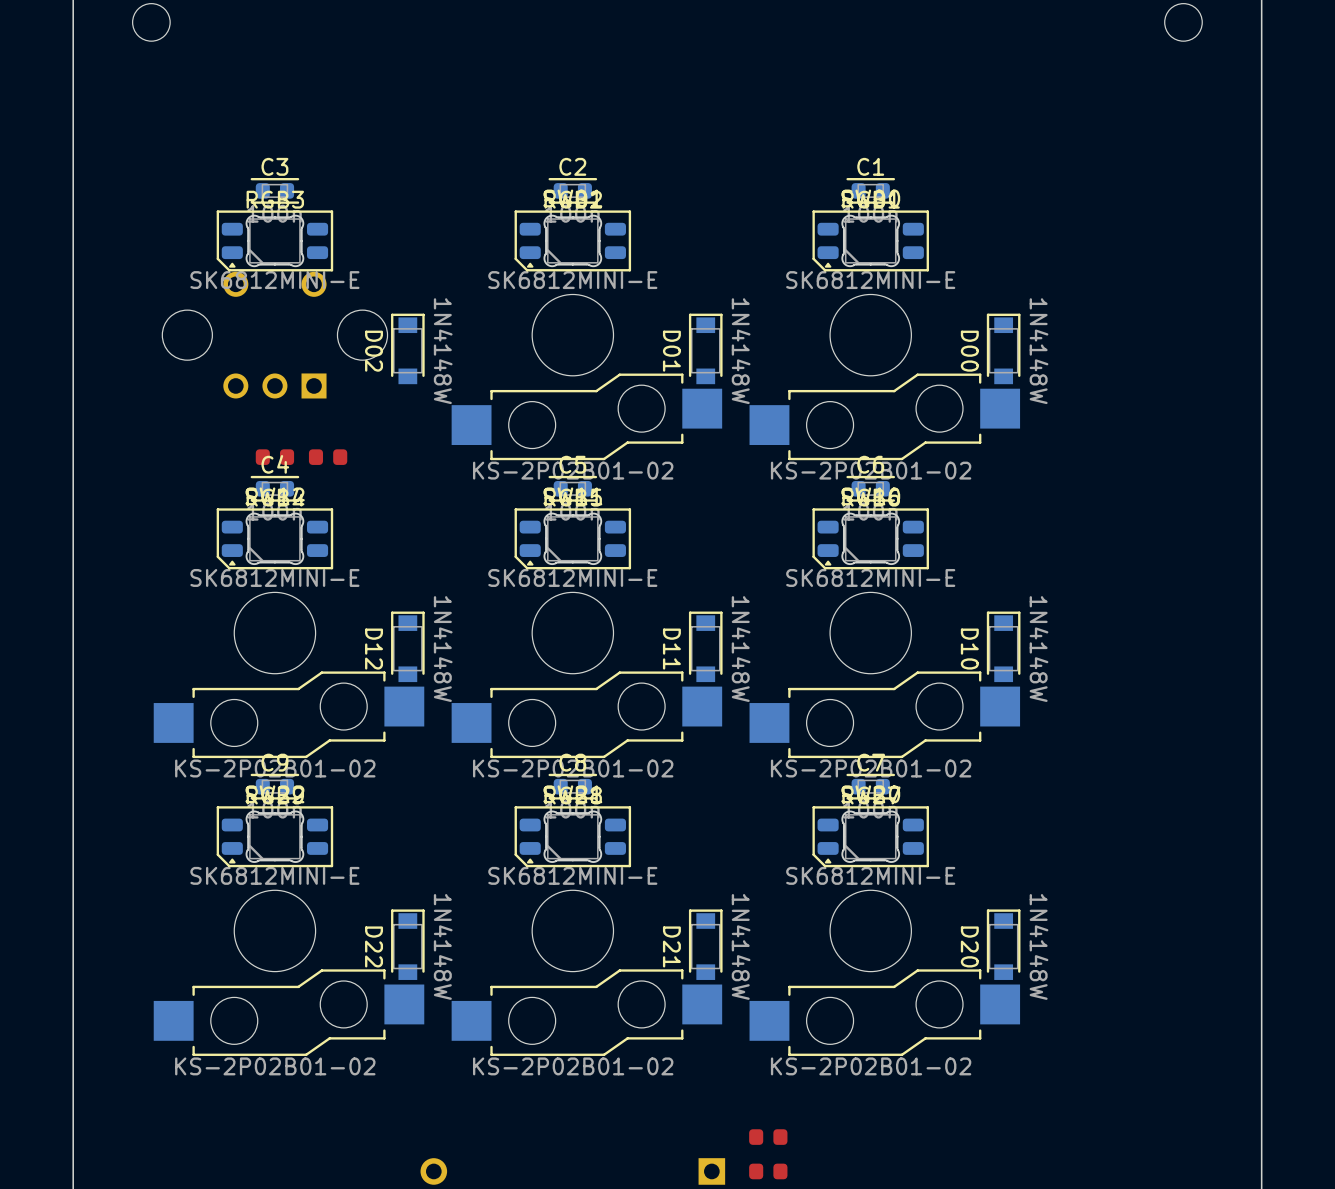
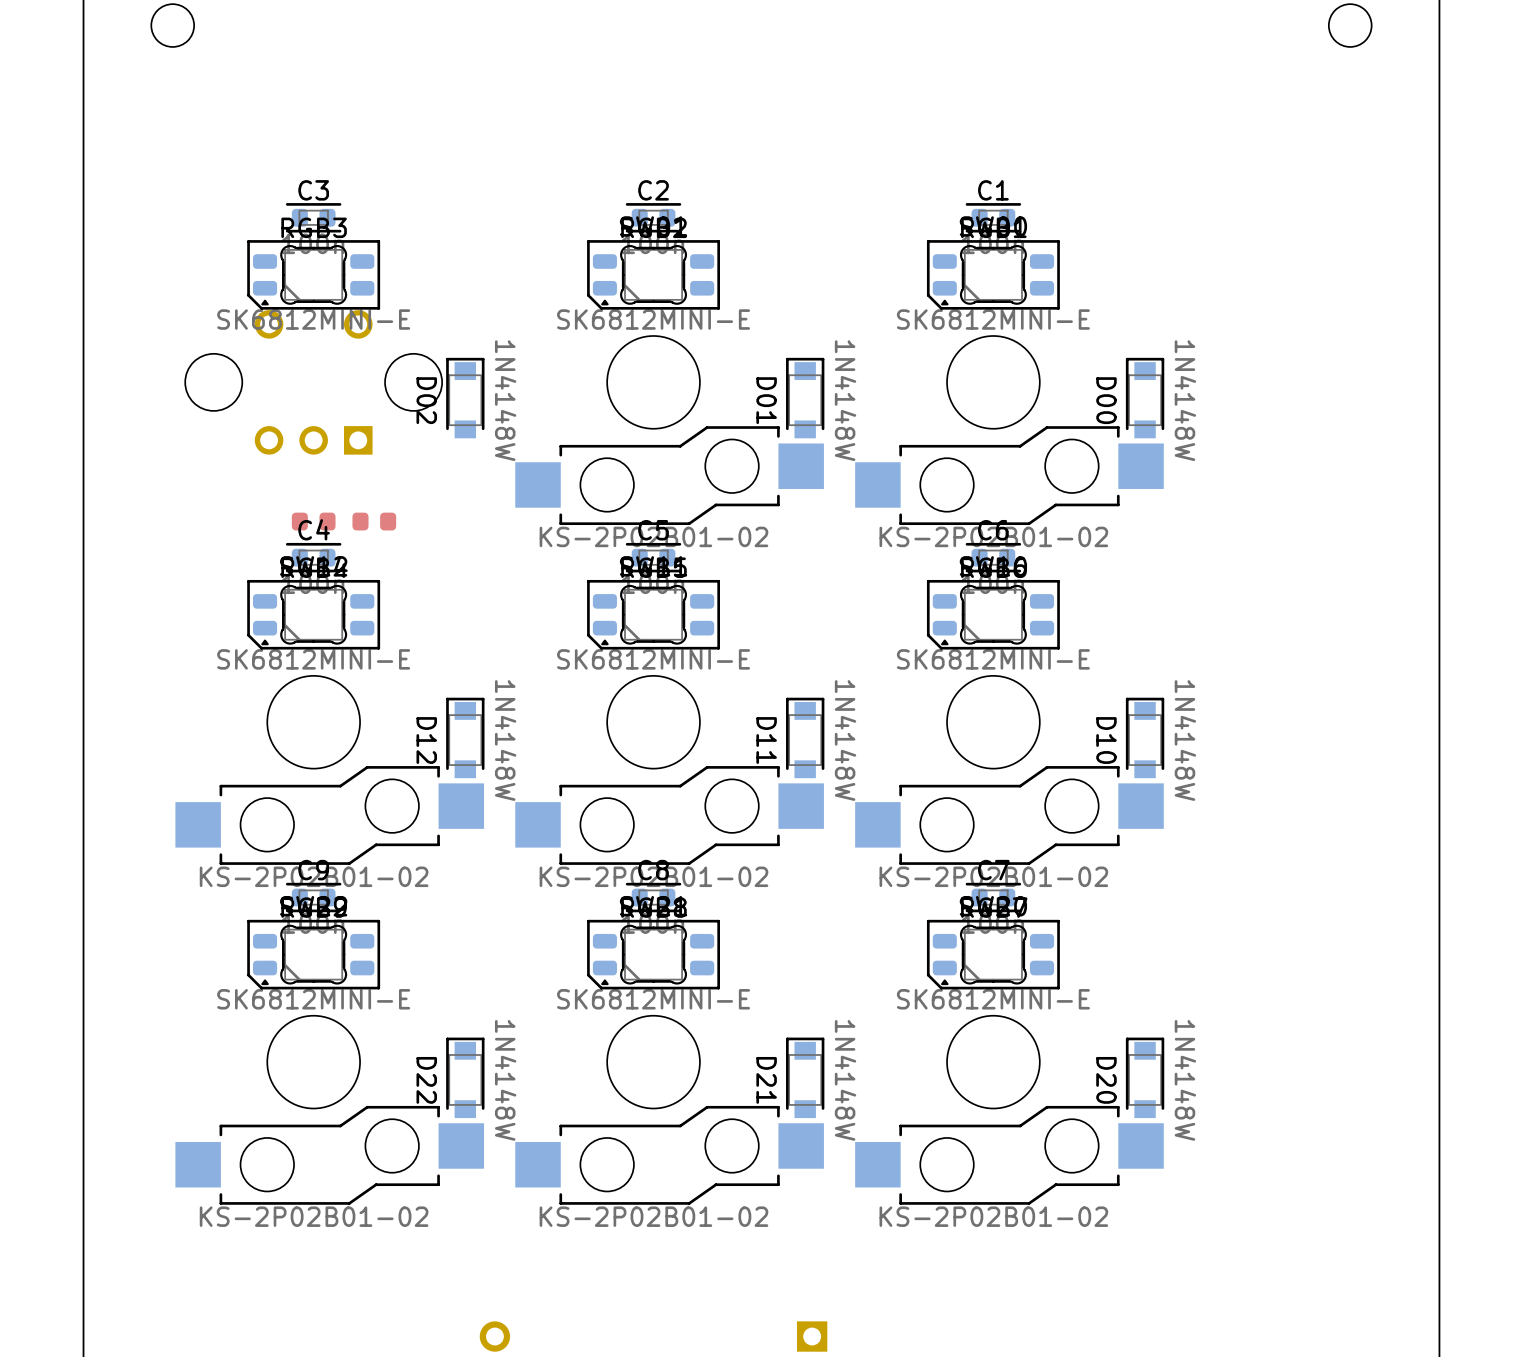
part: (768, 1137) -> none
part: (768, 1171) -> none

